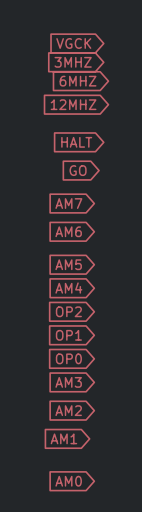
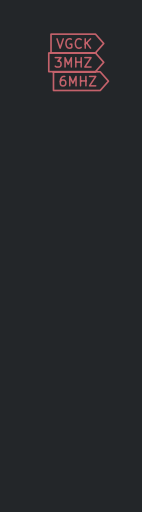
global label: 12MHZ (73, 104) -> none
global label: HALT (76, 142) -> none
global label: GO (78, 170) -> none
global label: AM7 (68, 203) -> none
global label: AM6 (68, 231) -> none
global label: AM5 (68, 264) -> none
global label: AM4 (68, 288) -> none
global label: OP2 (68, 311) -> none
global label: OP1 (68, 335) -> none
global label: OP0 (68, 358) -> none
global label: AM3 (68, 382) -> none
global label: AM2 (68, 410) -> none
global label: AM1 (63, 438) -> none
global label: AM0 (68, 481) -> none

